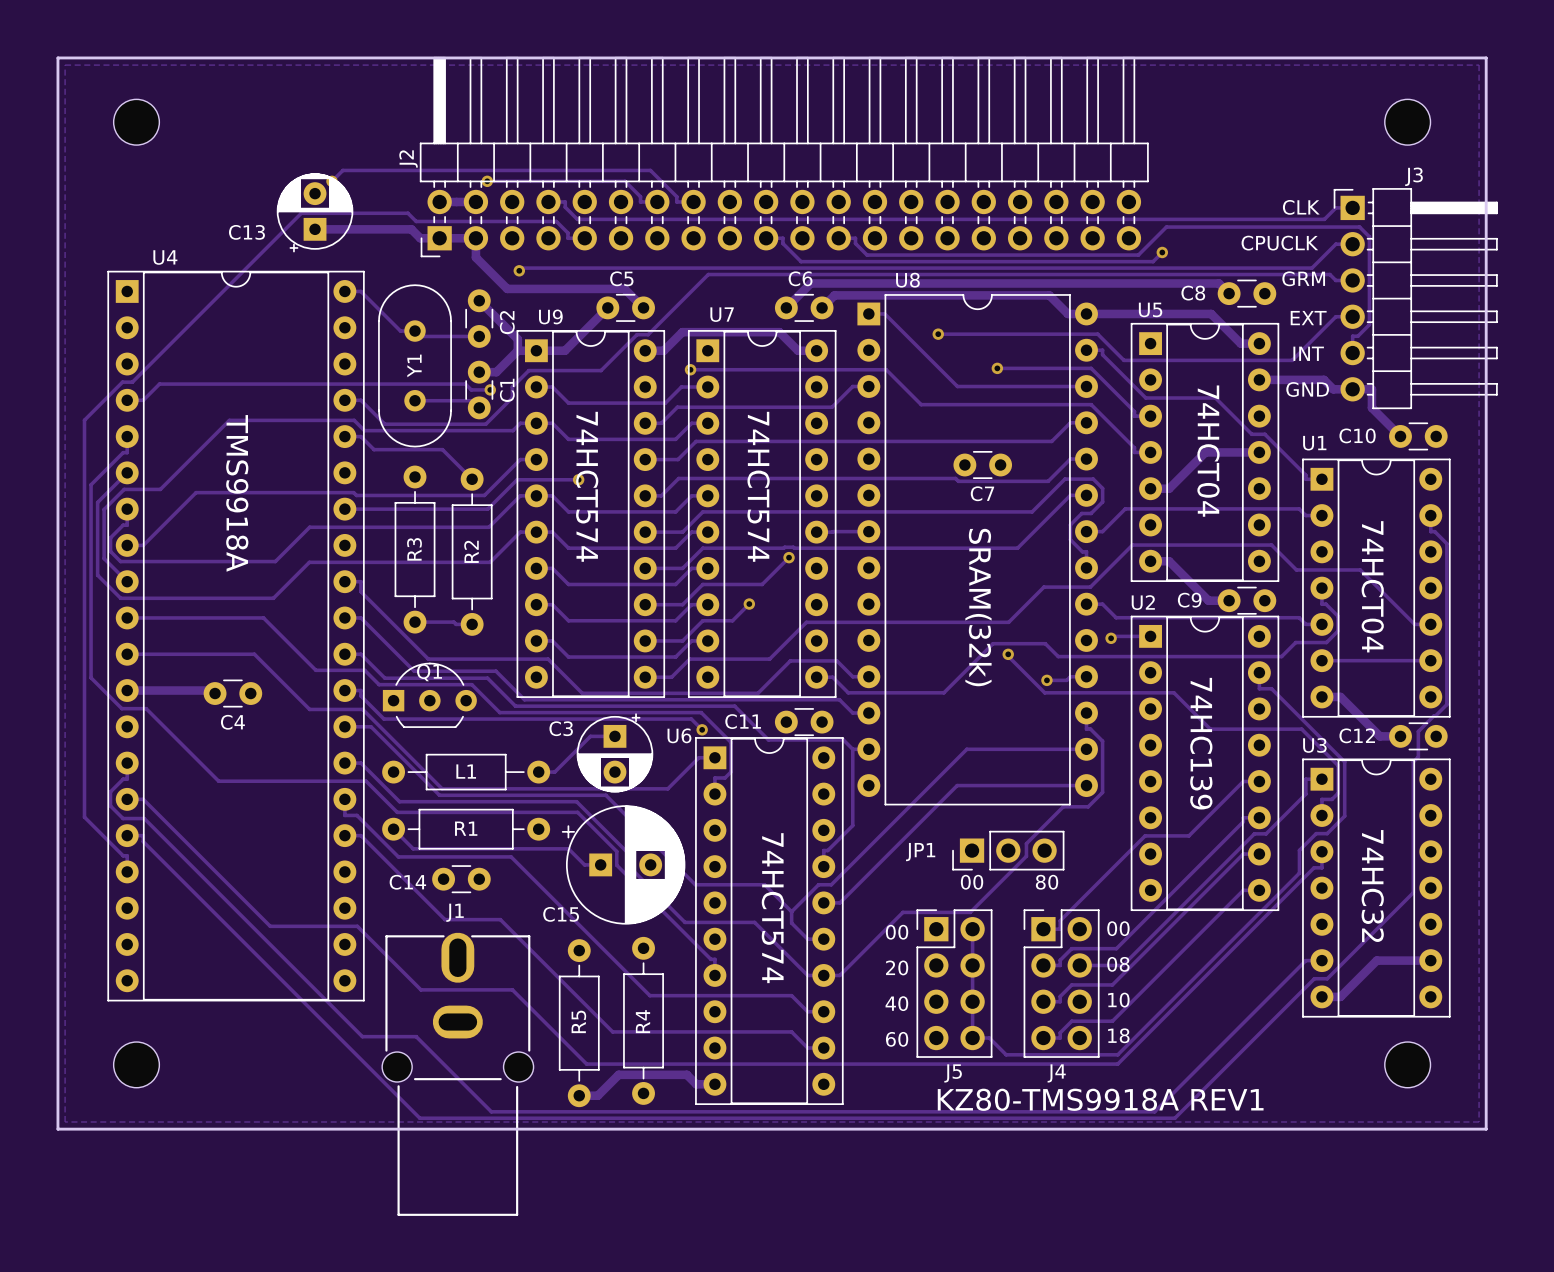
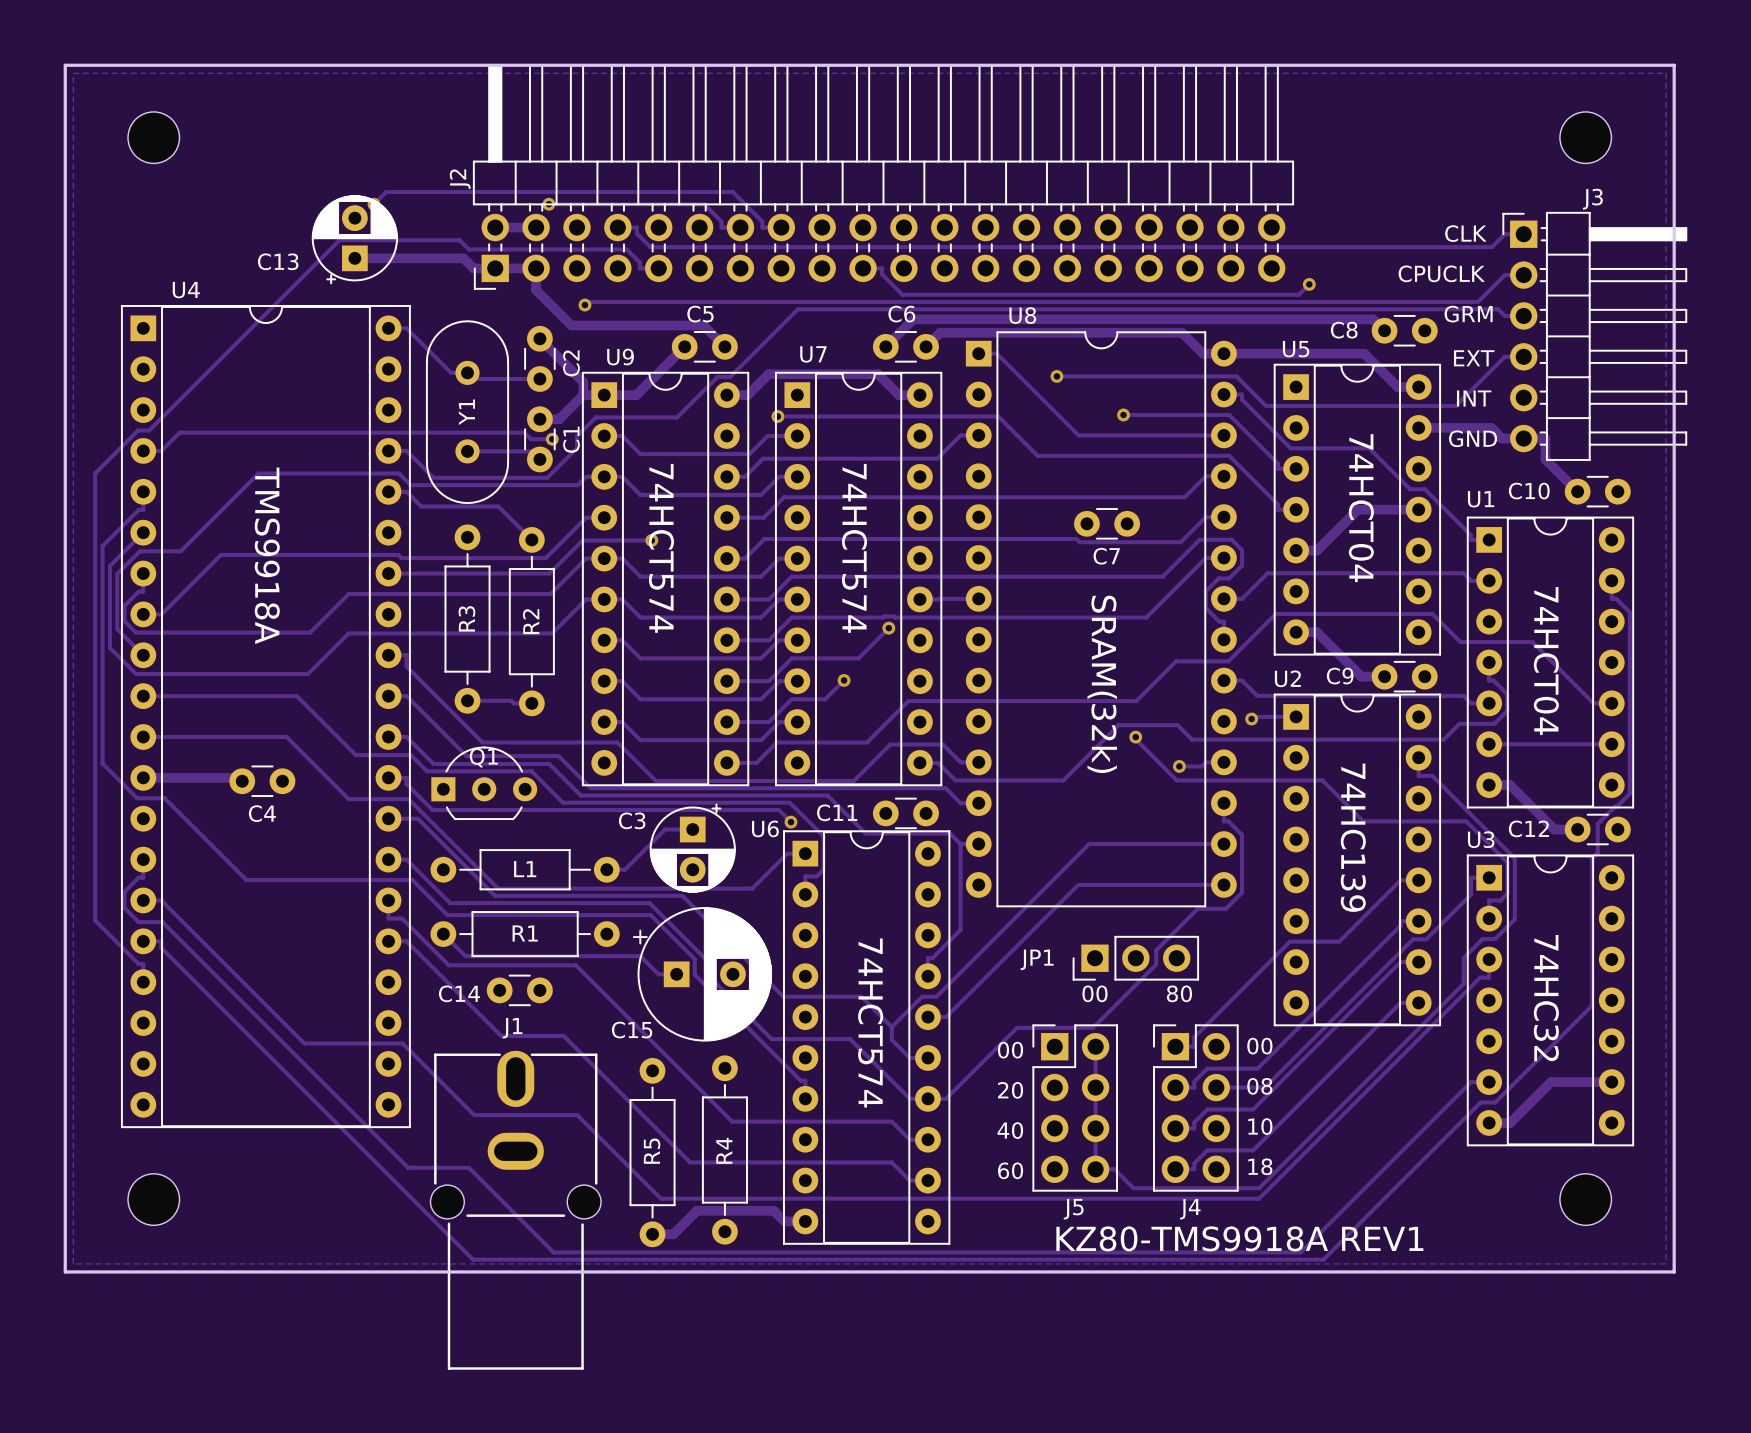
track: (838, 238) (855, 238) (855, 243) (867, 255) (1138, 255) (1166, 227) (1359, 227) (1369, 236) (1369, 324) (1357, 336) (1352, 336) (1352, 353) -> none

